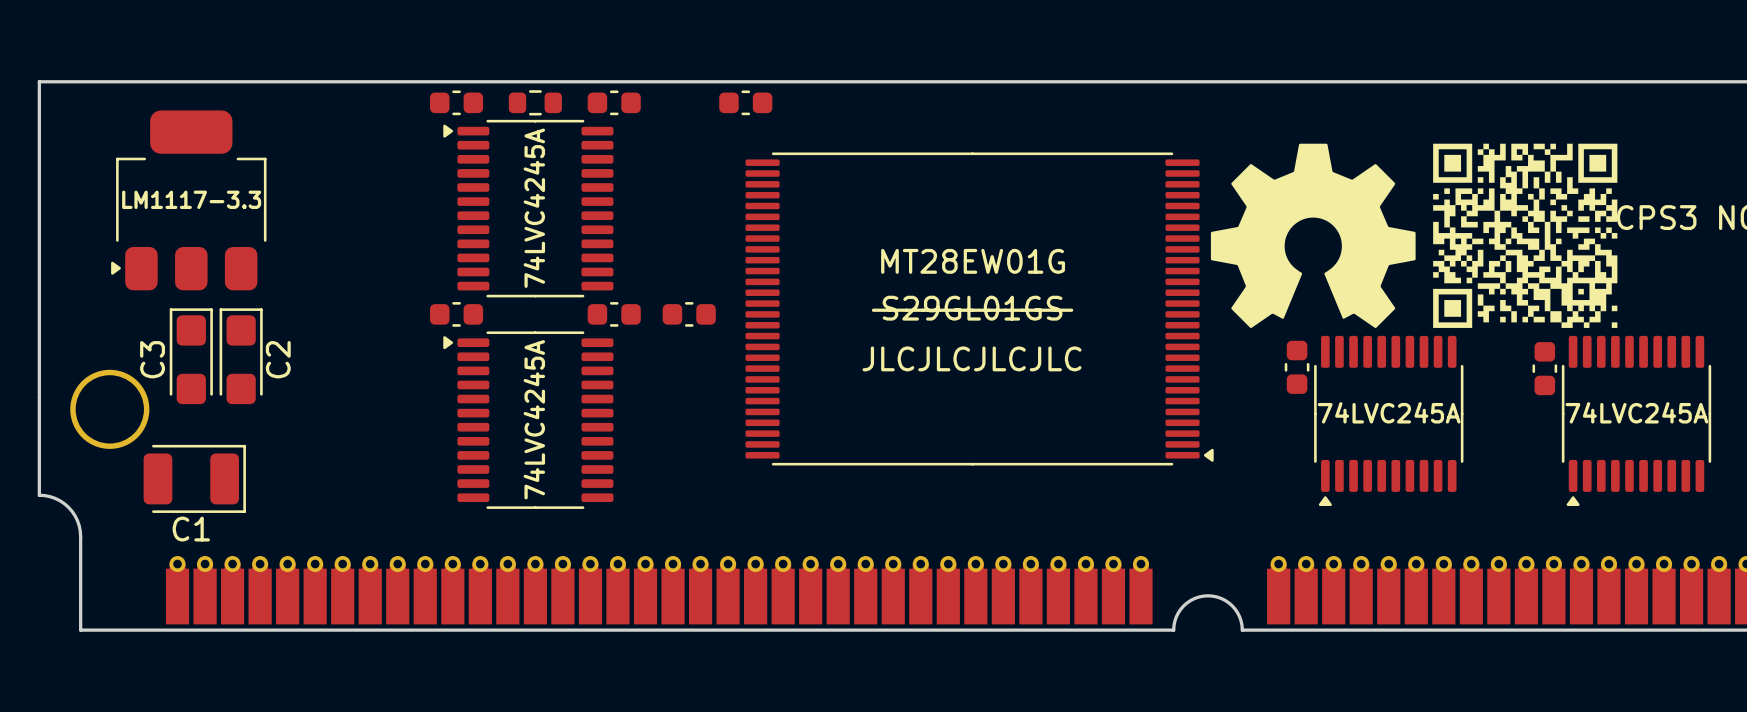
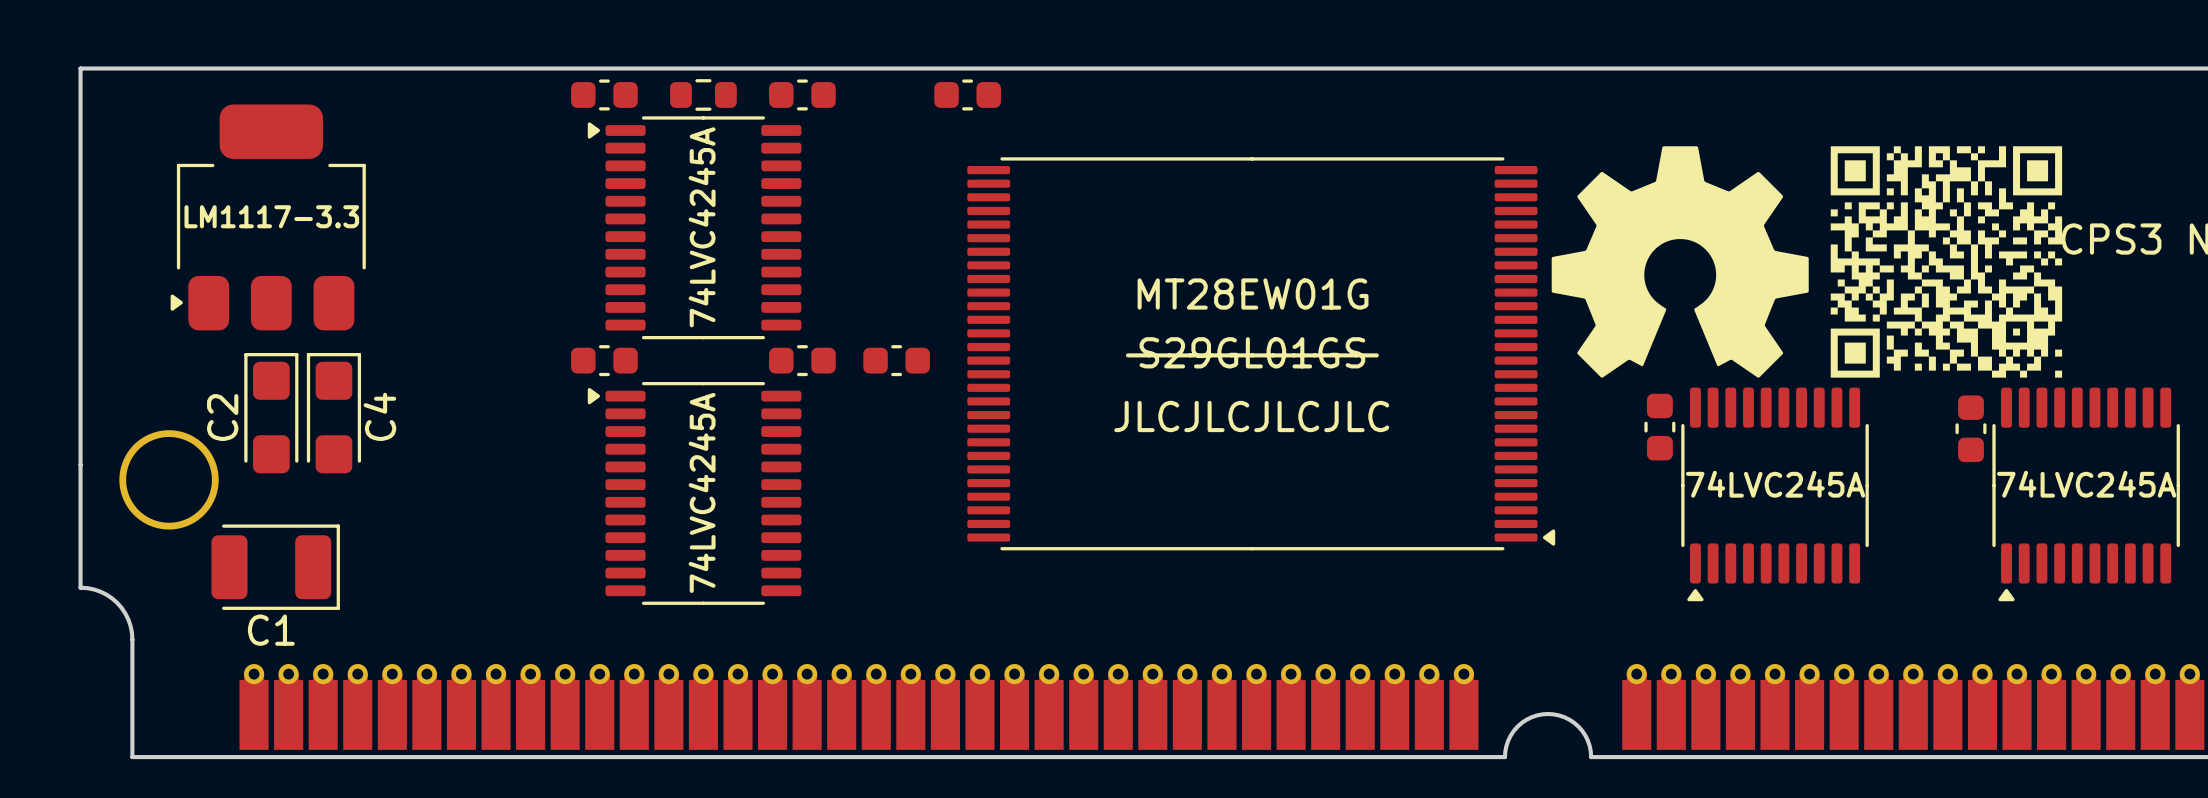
C3 name: C3 (152, 359) -> C2 (222, 417)
C2 name: C2 (278, 359) -> C4 (379, 416)

